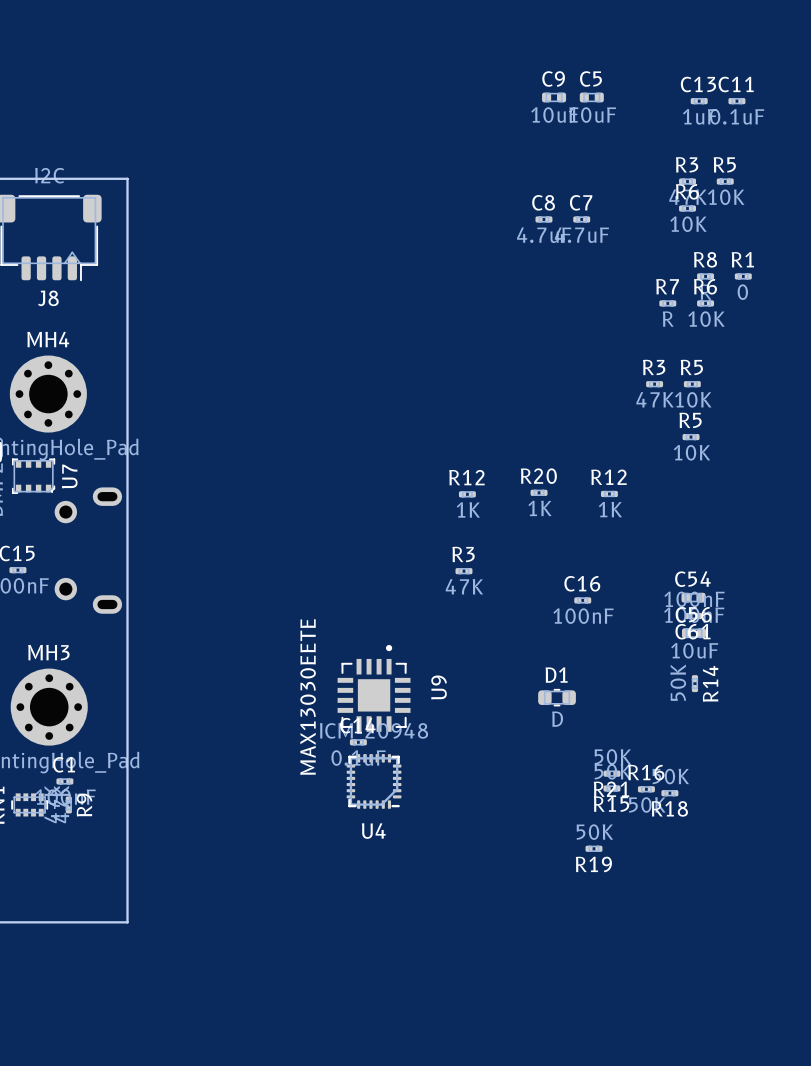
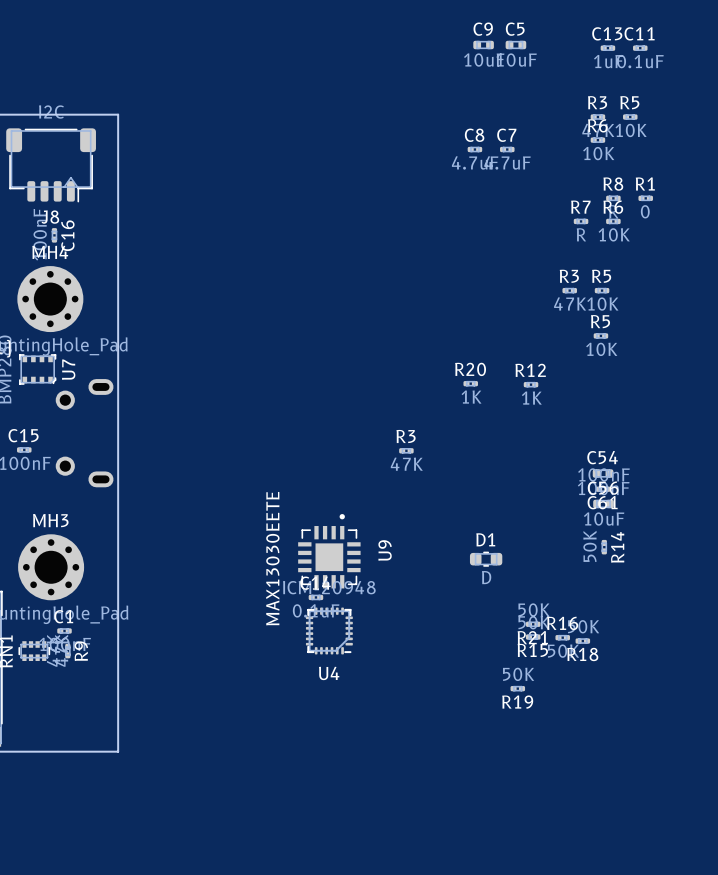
R12: 1K (467, 494) -> none
C16 rotation: 0° (582, 600) -> 90° clockwise (54, 235)
C16 position: (582, 600) -> (54, 235)

